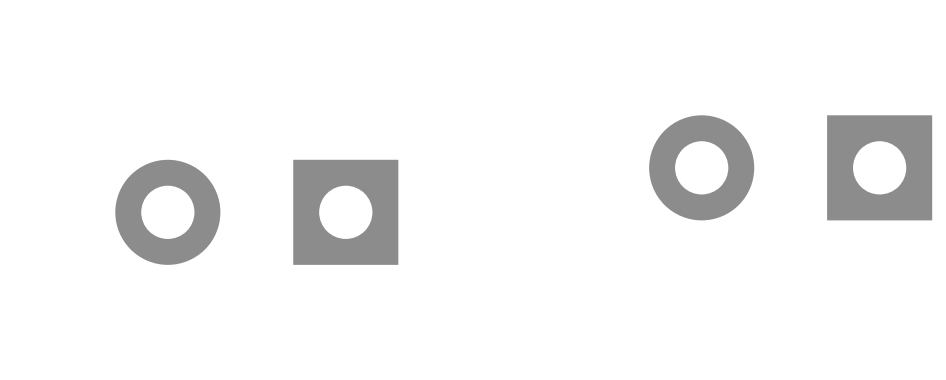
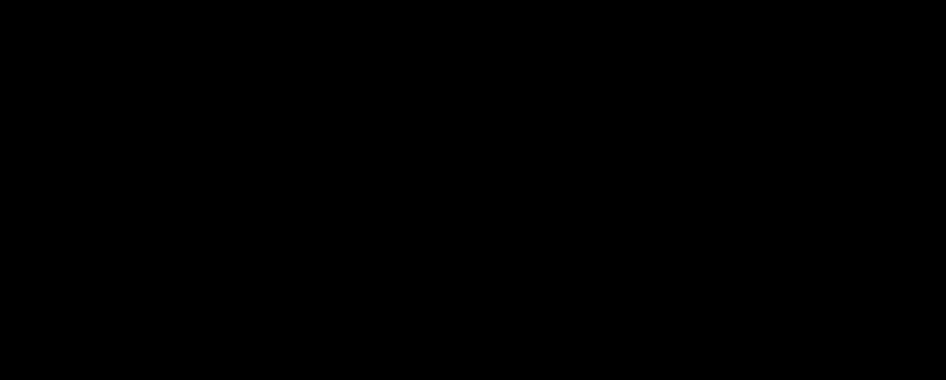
part: (790, 167) -> none
part: (256, 212) -> none

